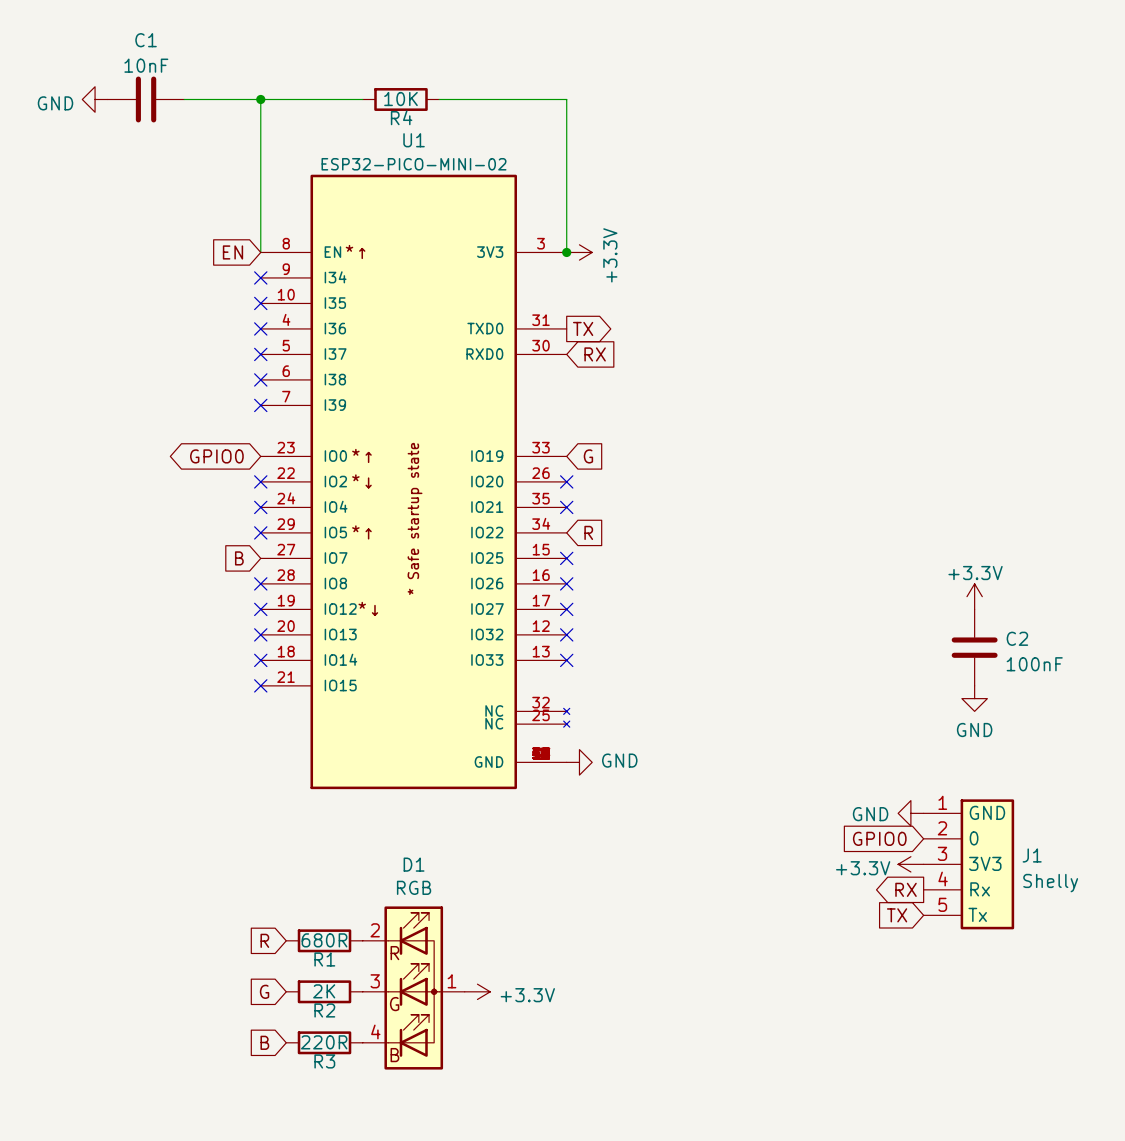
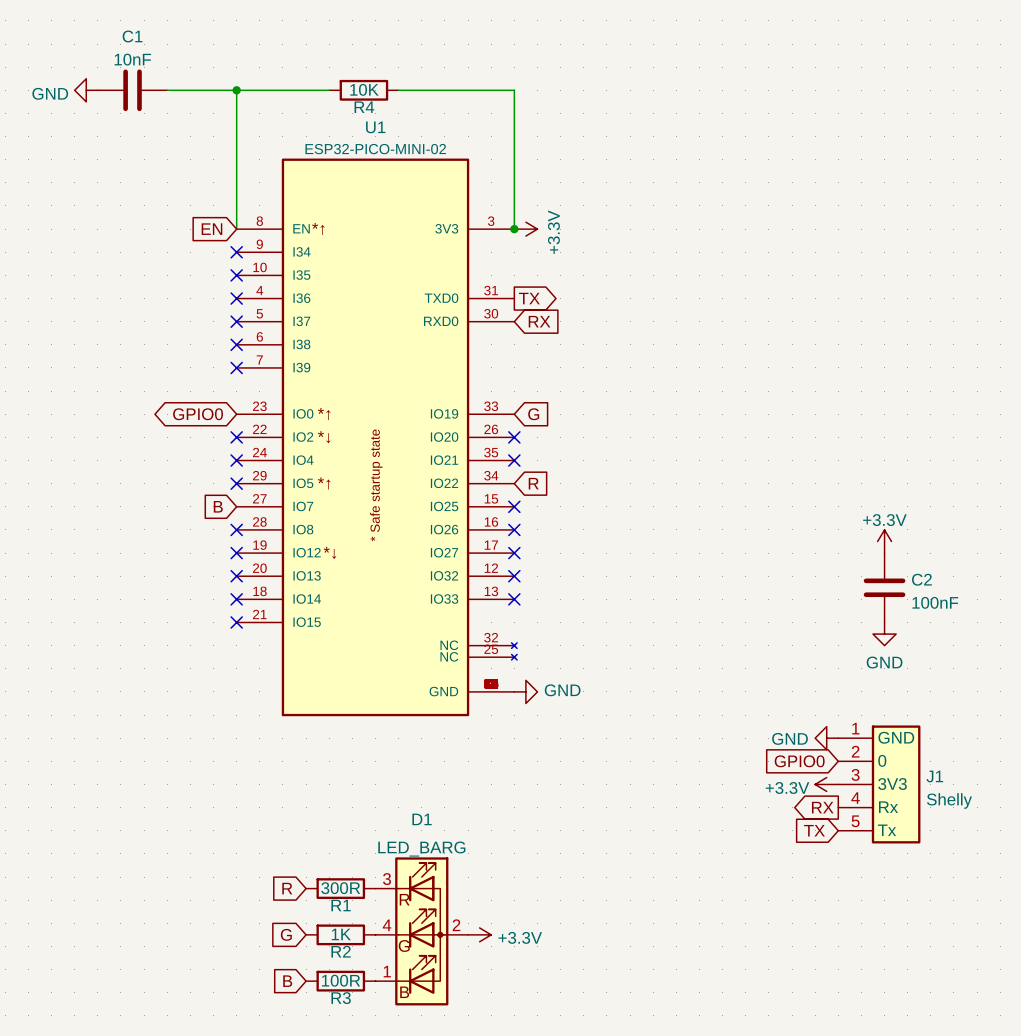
D1 value: RGB (414, 887) -> LED_BARG (421, 849)
D1 pin number: 2 (375, 930) -> 3 (387, 879)
global label position: R (264, 940) -> R (287, 888)
R1 position: (324, 940) -> (340, 888)
R1 value: 680R (324, 940) -> 300R (340, 888)
D1 pin number: 3 (375, 981) -> 4 (387, 925)
D1 pin number: 1 (451, 981) -> 2 (456, 925)
D1 position: (413, 988) -> (421, 931)
global label position: G (264, 991) -> G (286, 934)
R2 position: (324, 991) -> (340, 934)
R2 value: 2K (324, 991) -> 1K (341, 934)
power symbol position: +3.3V (477, 991) -> +3.3V (479, 934)
D1 pin number: 4 (375, 1031) -> 1 (387, 971)
global label position: B (264, 1042) -> B (287, 981)
R3 position: (324, 1042) -> (340, 981)
R3 value: 220R (324, 1042) -> 100R (341, 980)

